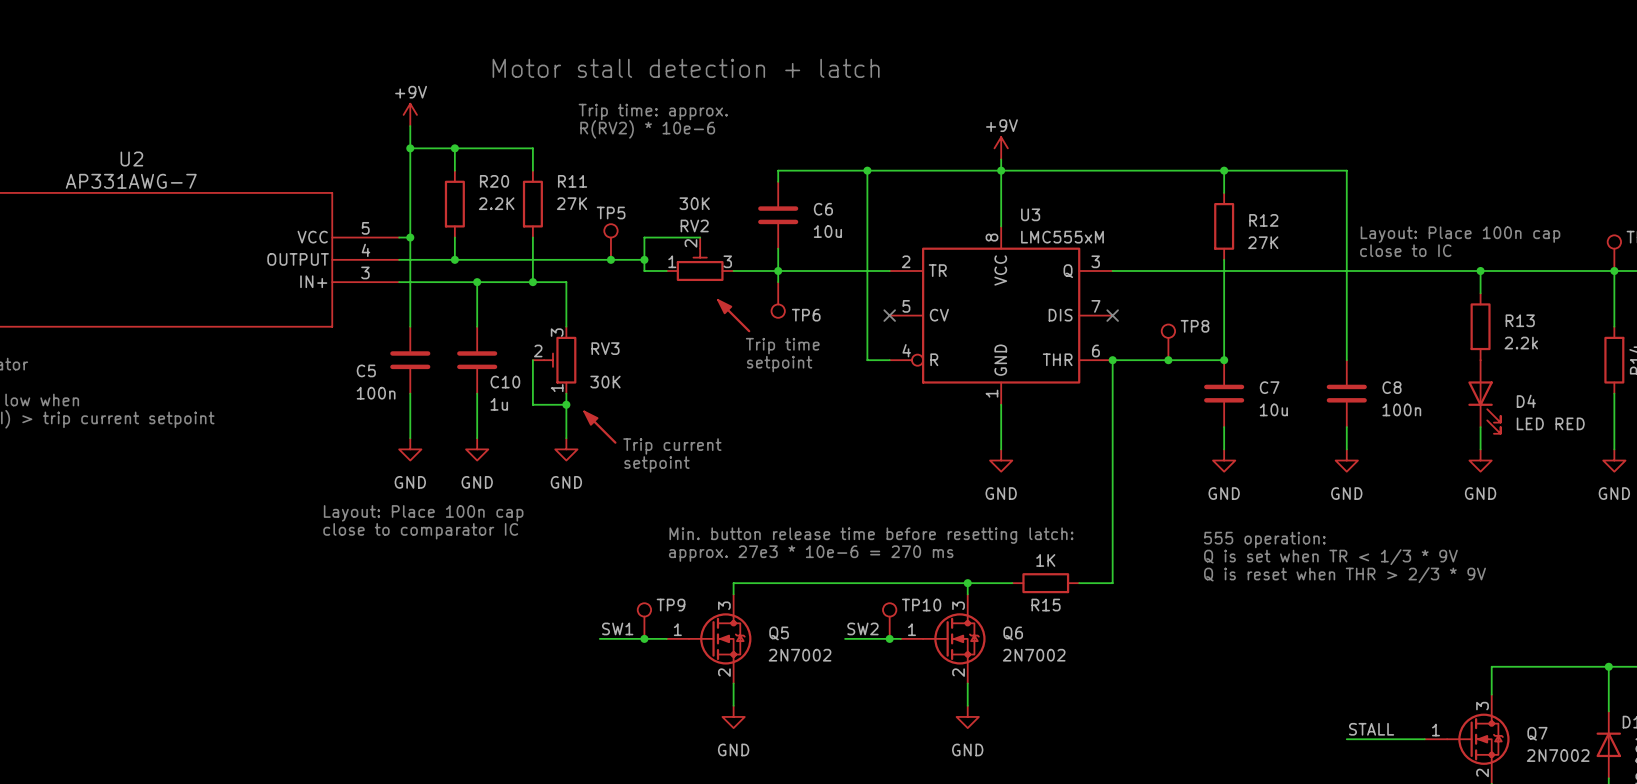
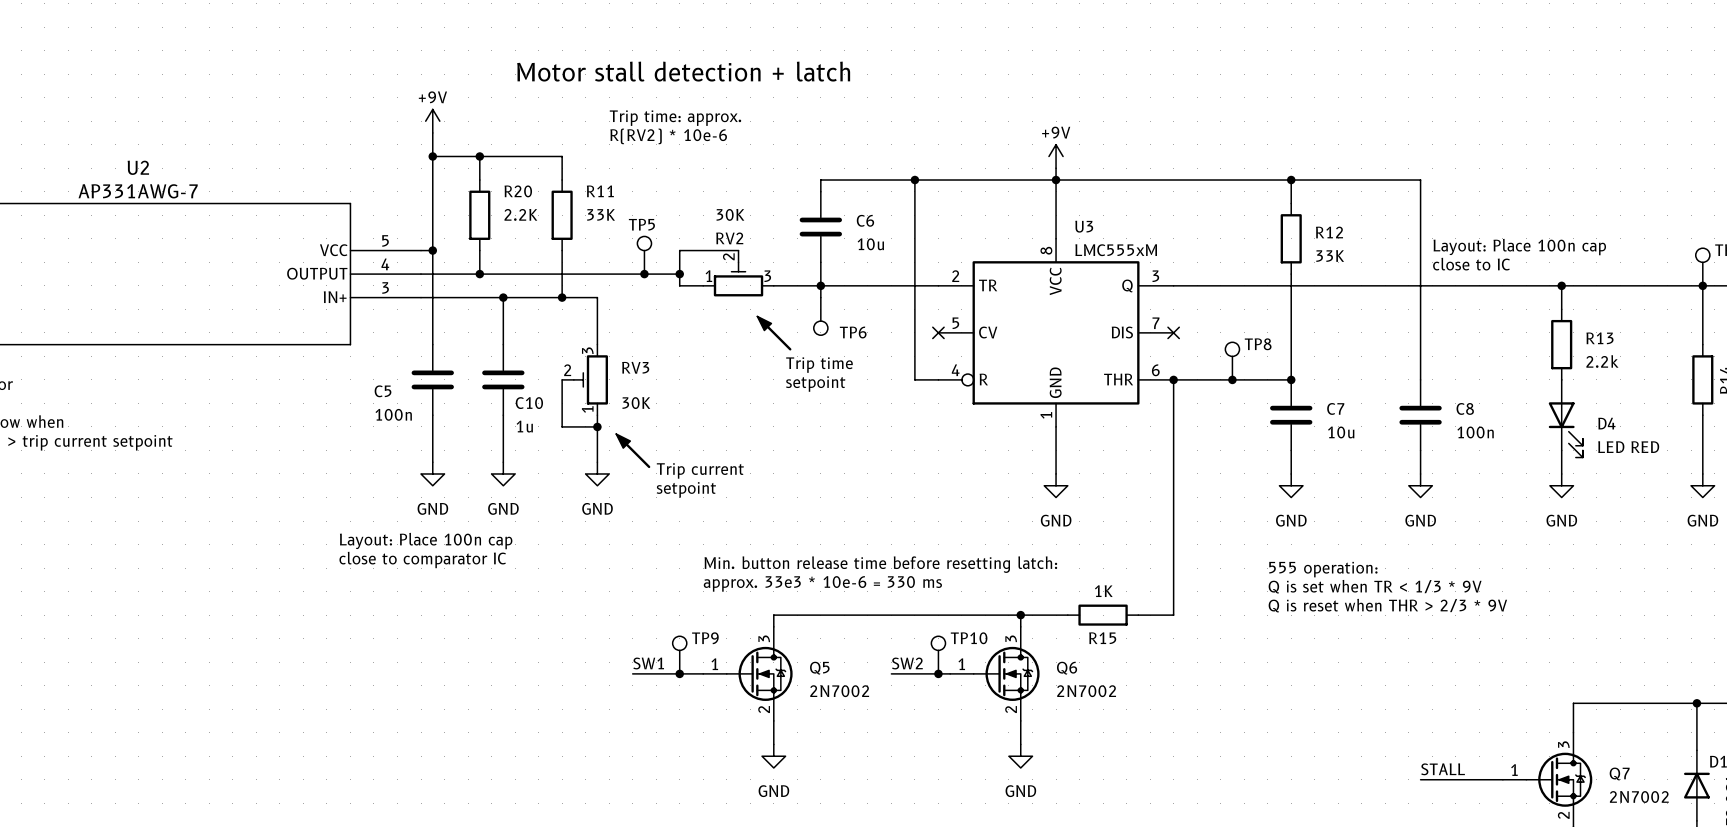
R11 value: 27K (572, 203) -> 33K (601, 214)
R12 value: 27K (1263, 242) -> 33K (1330, 256)
text: approx. 27e3 * 10e-6 = 270 ms (811, 553) -> approx. 33e3 * 10e-6 = 330 ms (822, 583)

